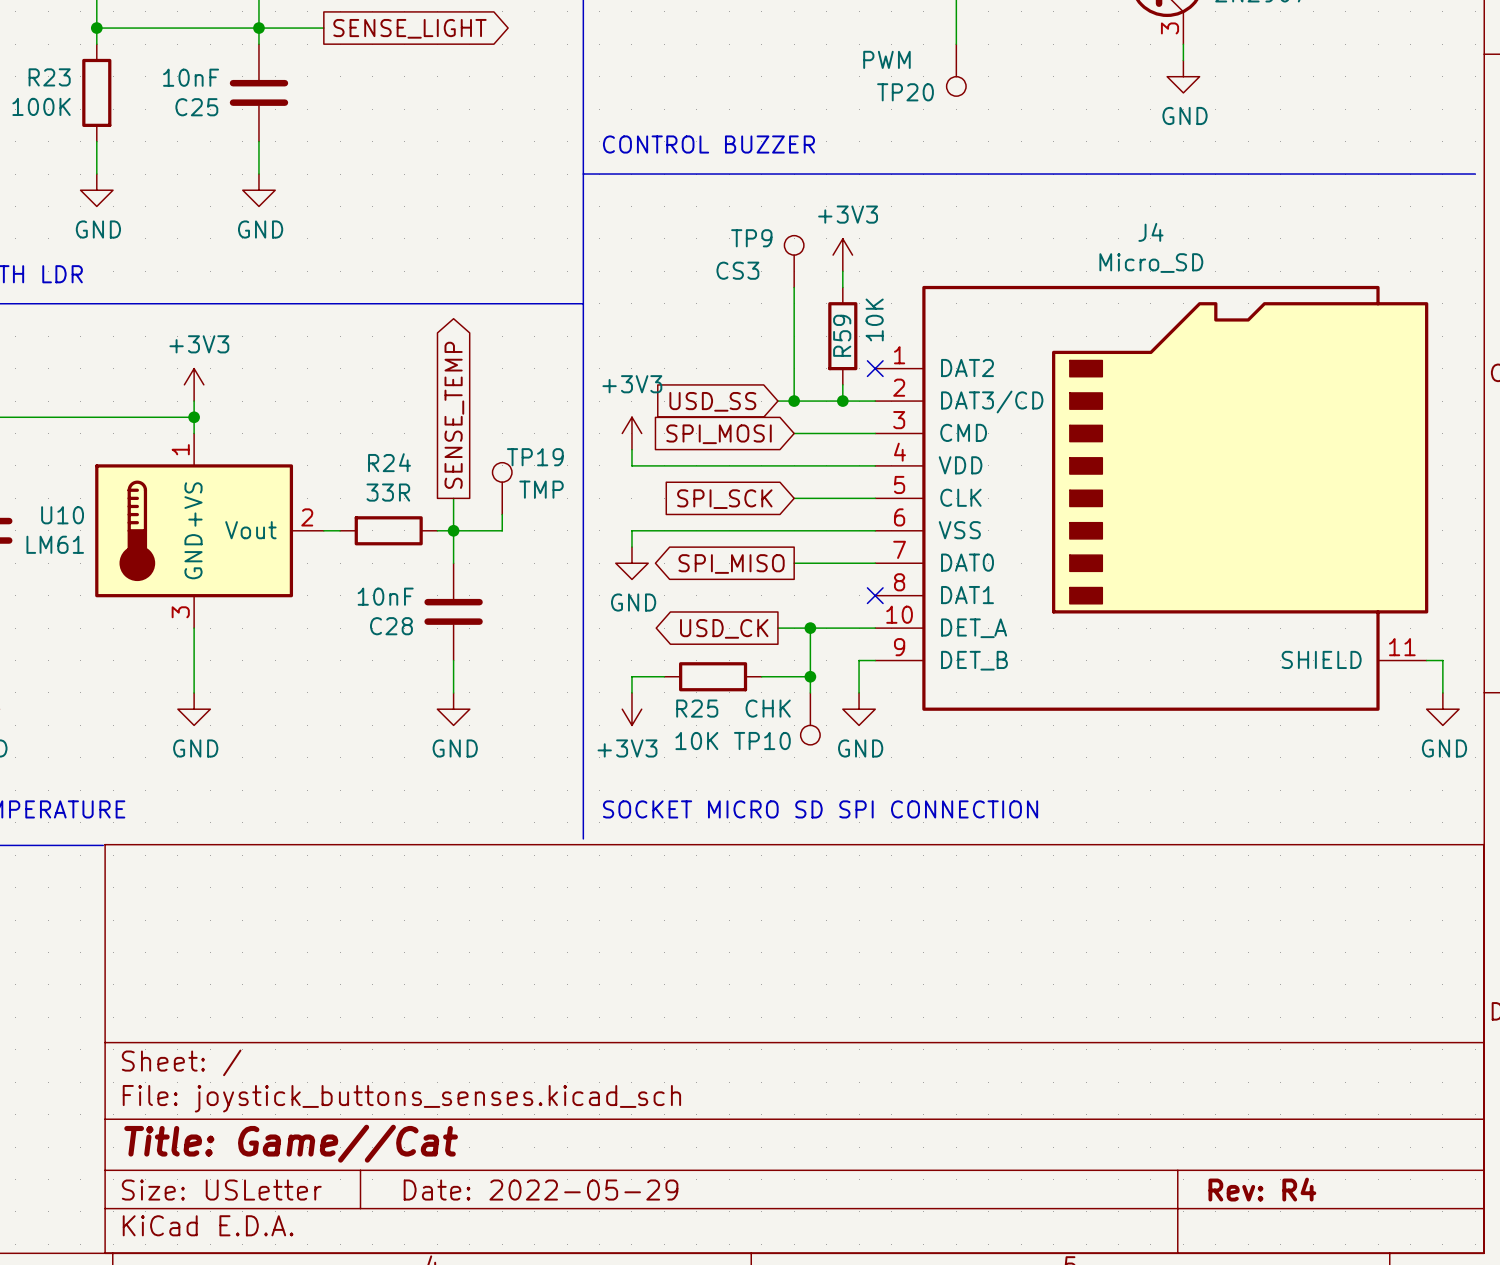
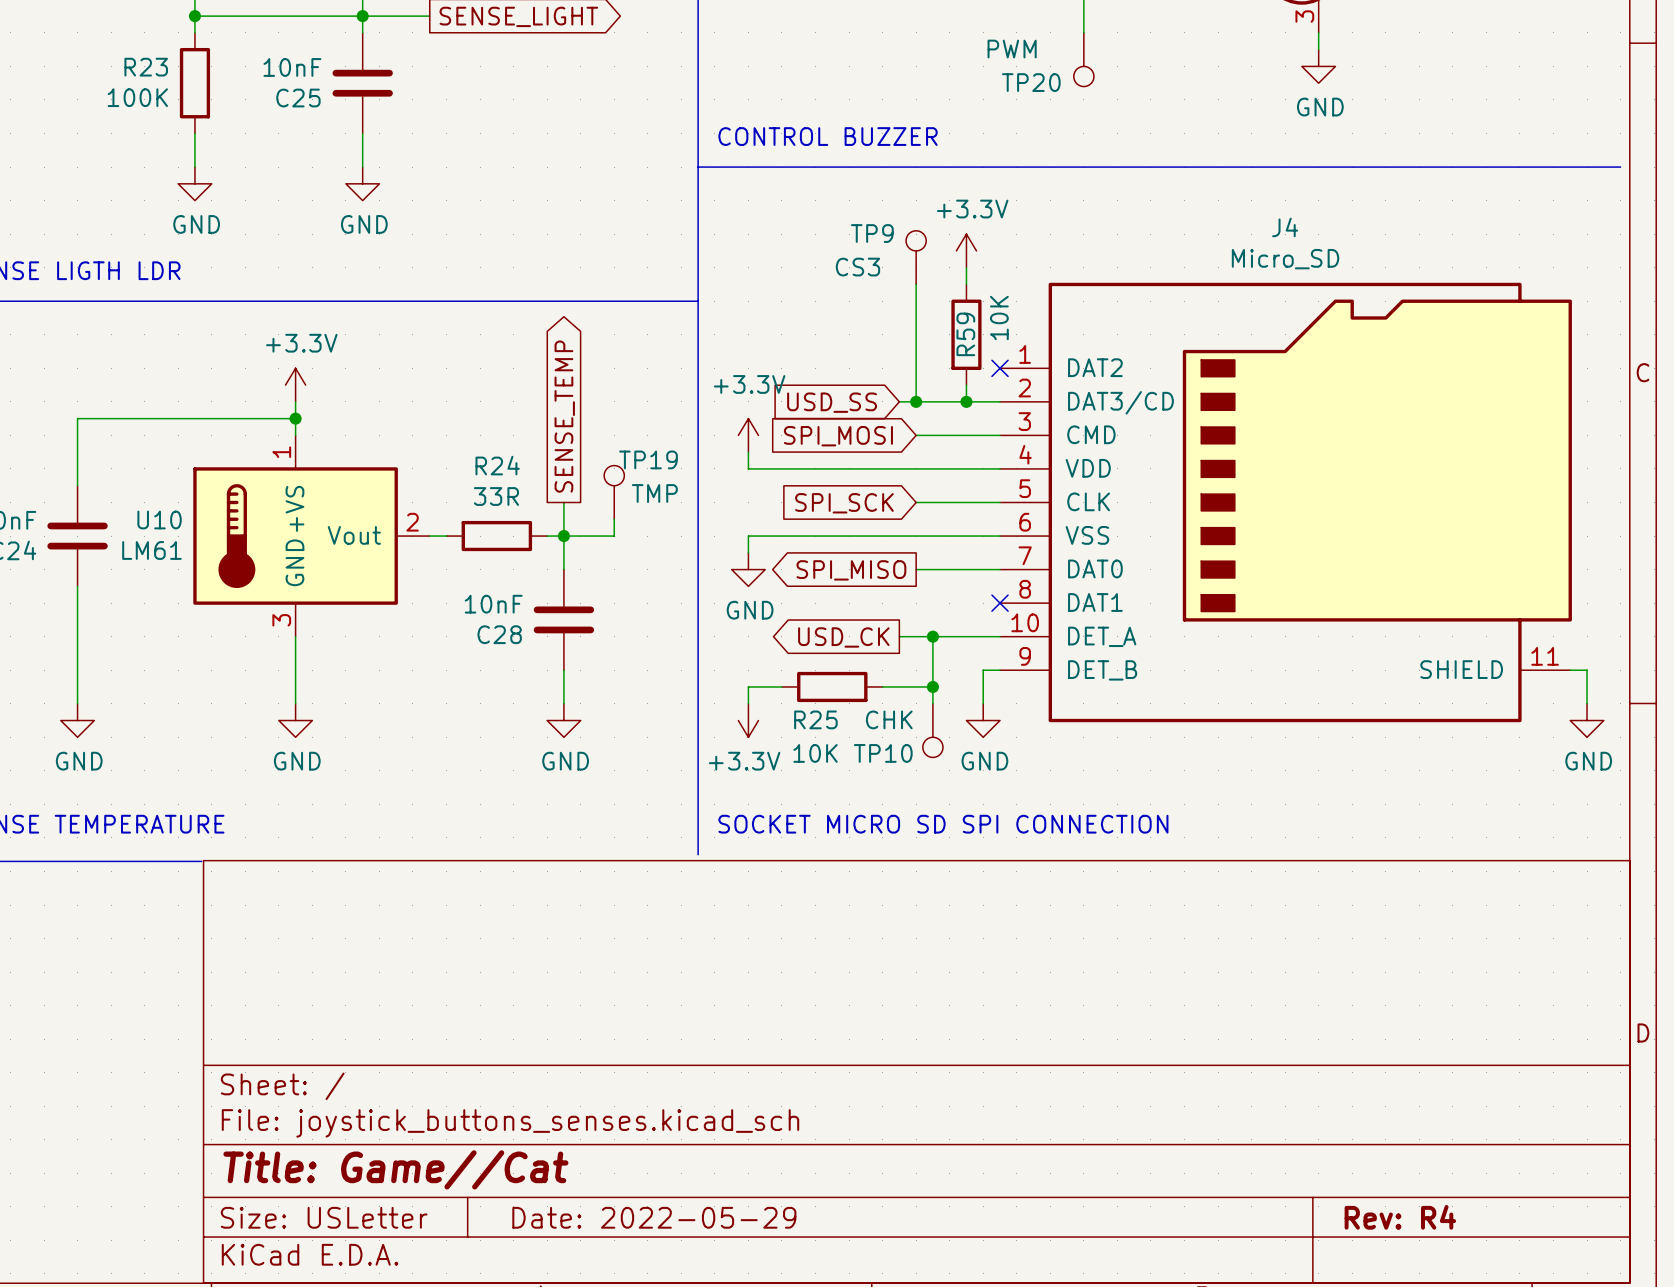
power symbol: +3V3 (842, 255) -> +3.3V (966, 250)
power symbol: +3V3 (194, 384) -> +3.3V (295, 385)
power symbol: +3V3 (631, 433) -> +3.3V (748, 435)
power symbol: +3V3 (631, 709) -> +3.3V (748, 720)

